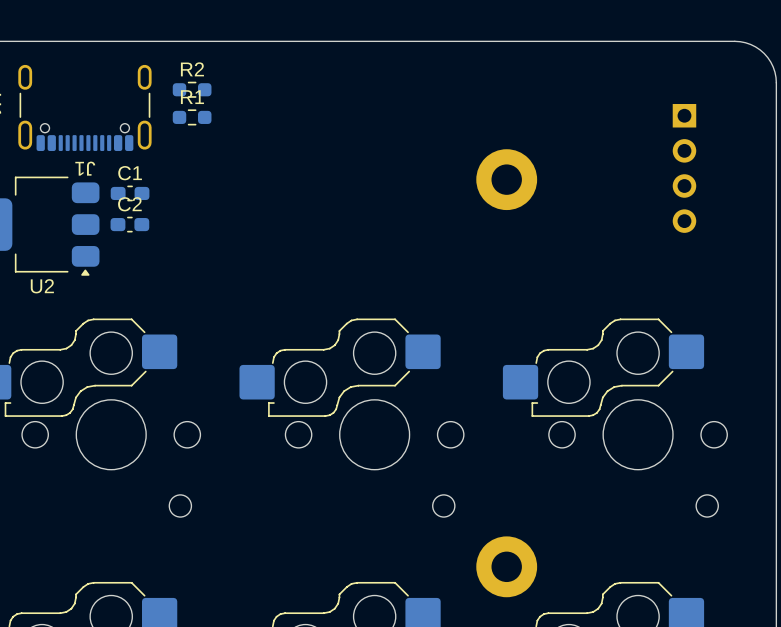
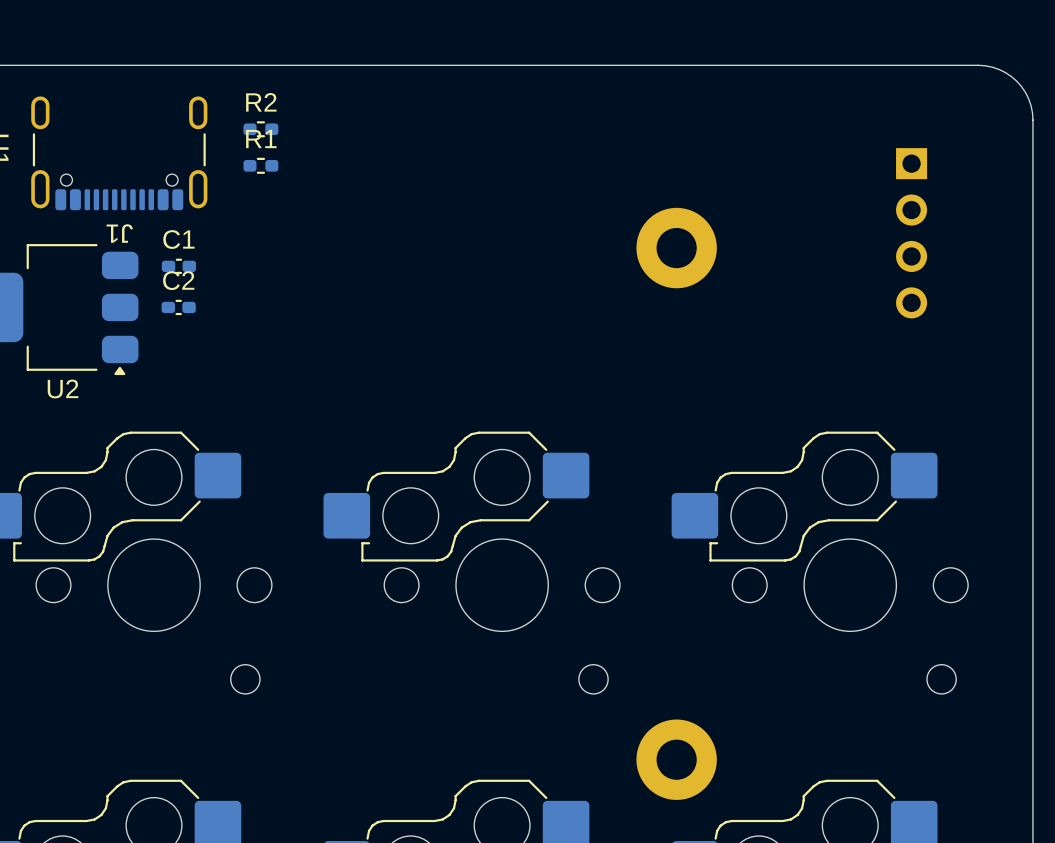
R2 footprint: [172, 81, 212, 98] -> [243, 121, 279, 138]
R1 footprint: [172, 109, 212, 126] -> [243, 157, 279, 174]
C1 footprint: [110, 185, 150, 202] -> [161, 258, 196, 275]
C2 footprint: [110, 216, 150, 233] -> [161, 299, 196, 316]

